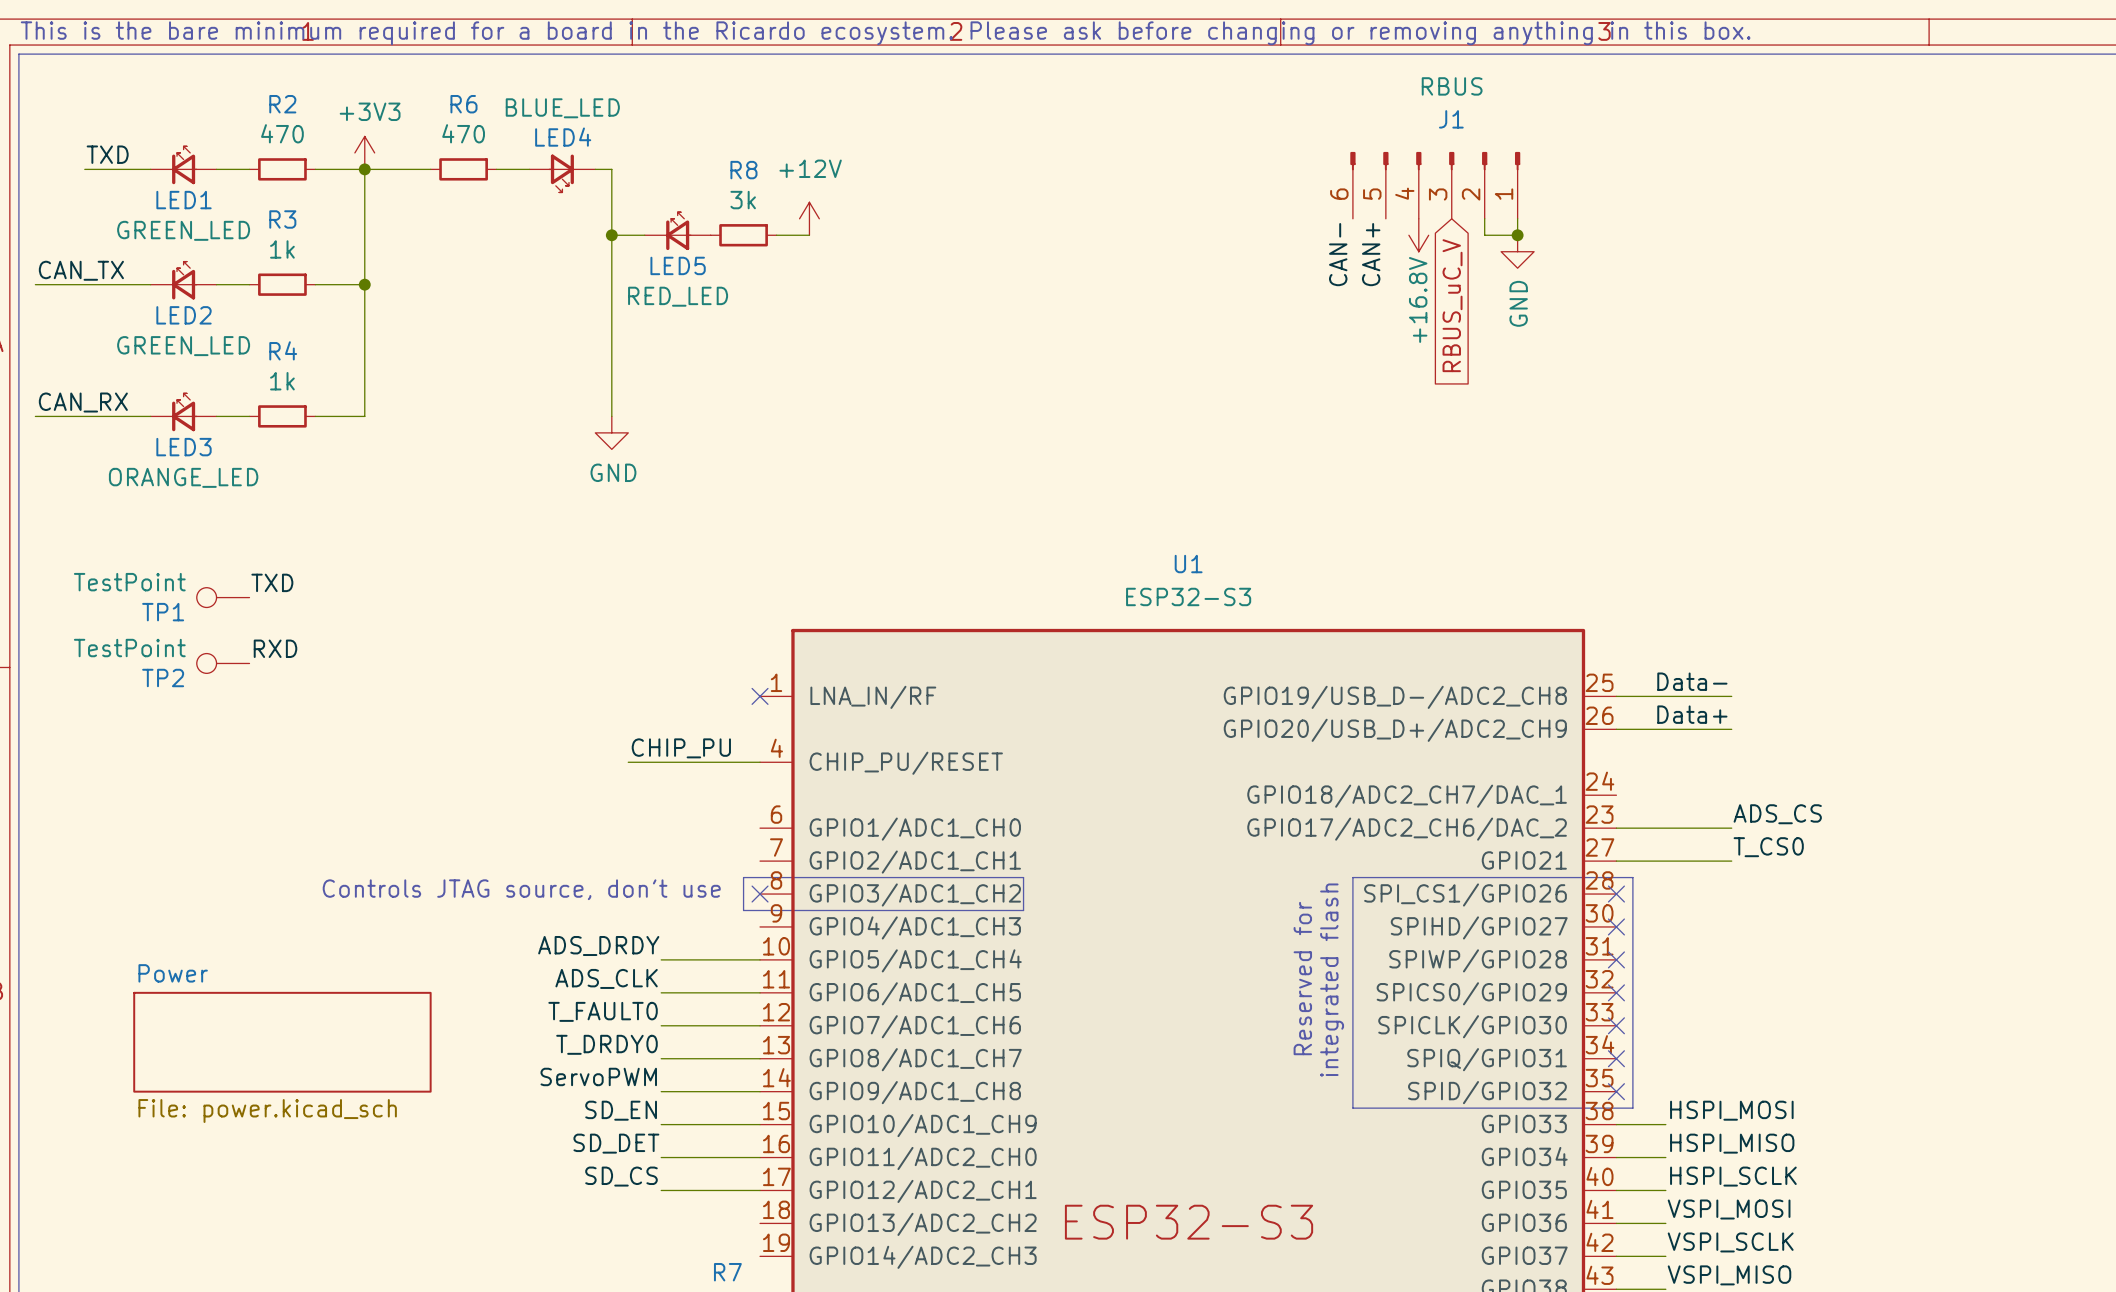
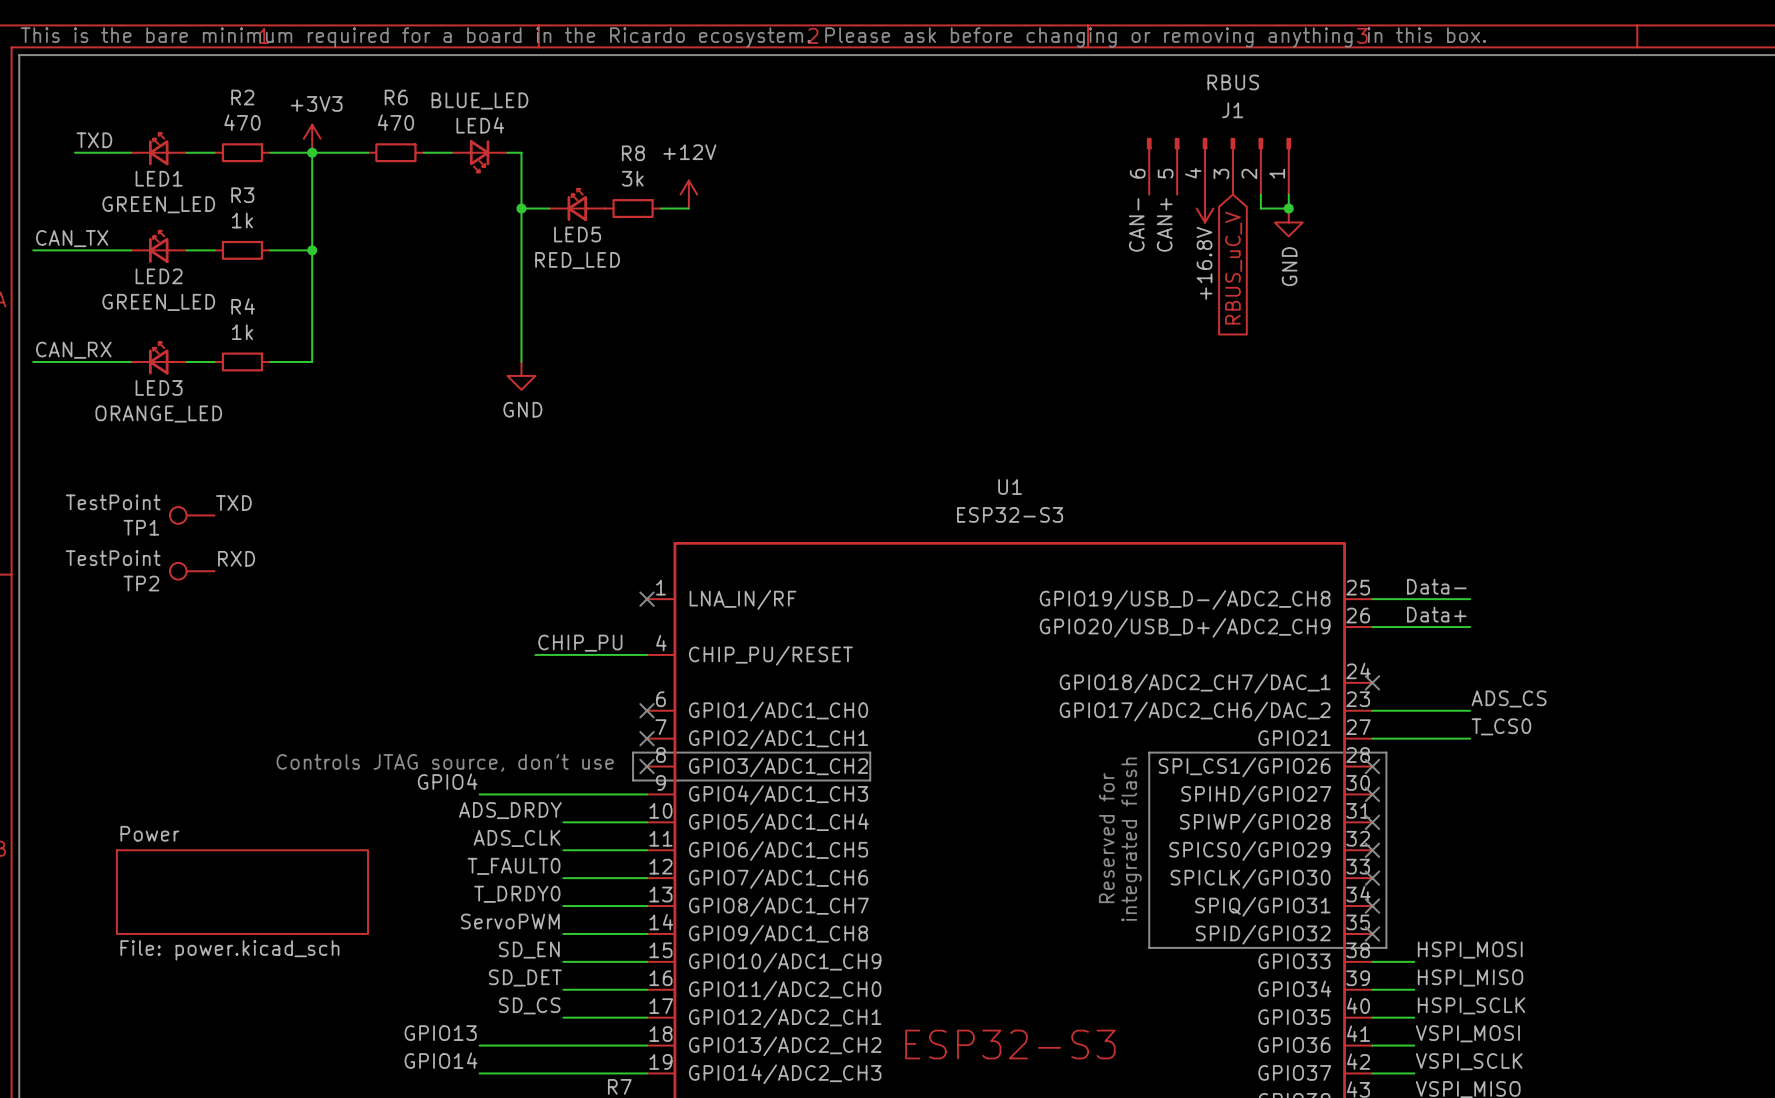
no-connect mark: none -> (1372, 682)
no-connect mark: none -> (647, 710)
no-connect mark: none -> (647, 738)
label: none -> GPIO4 (447, 781)
wire: none -> (479, 794) (647, 794)
label: none -> GPIO13 (440, 1033)
wire: none -> (479, 1045) (647, 1045)
label: none -> GPIO14 (440, 1060)
wire: none -> (479, 1073) (647, 1073)

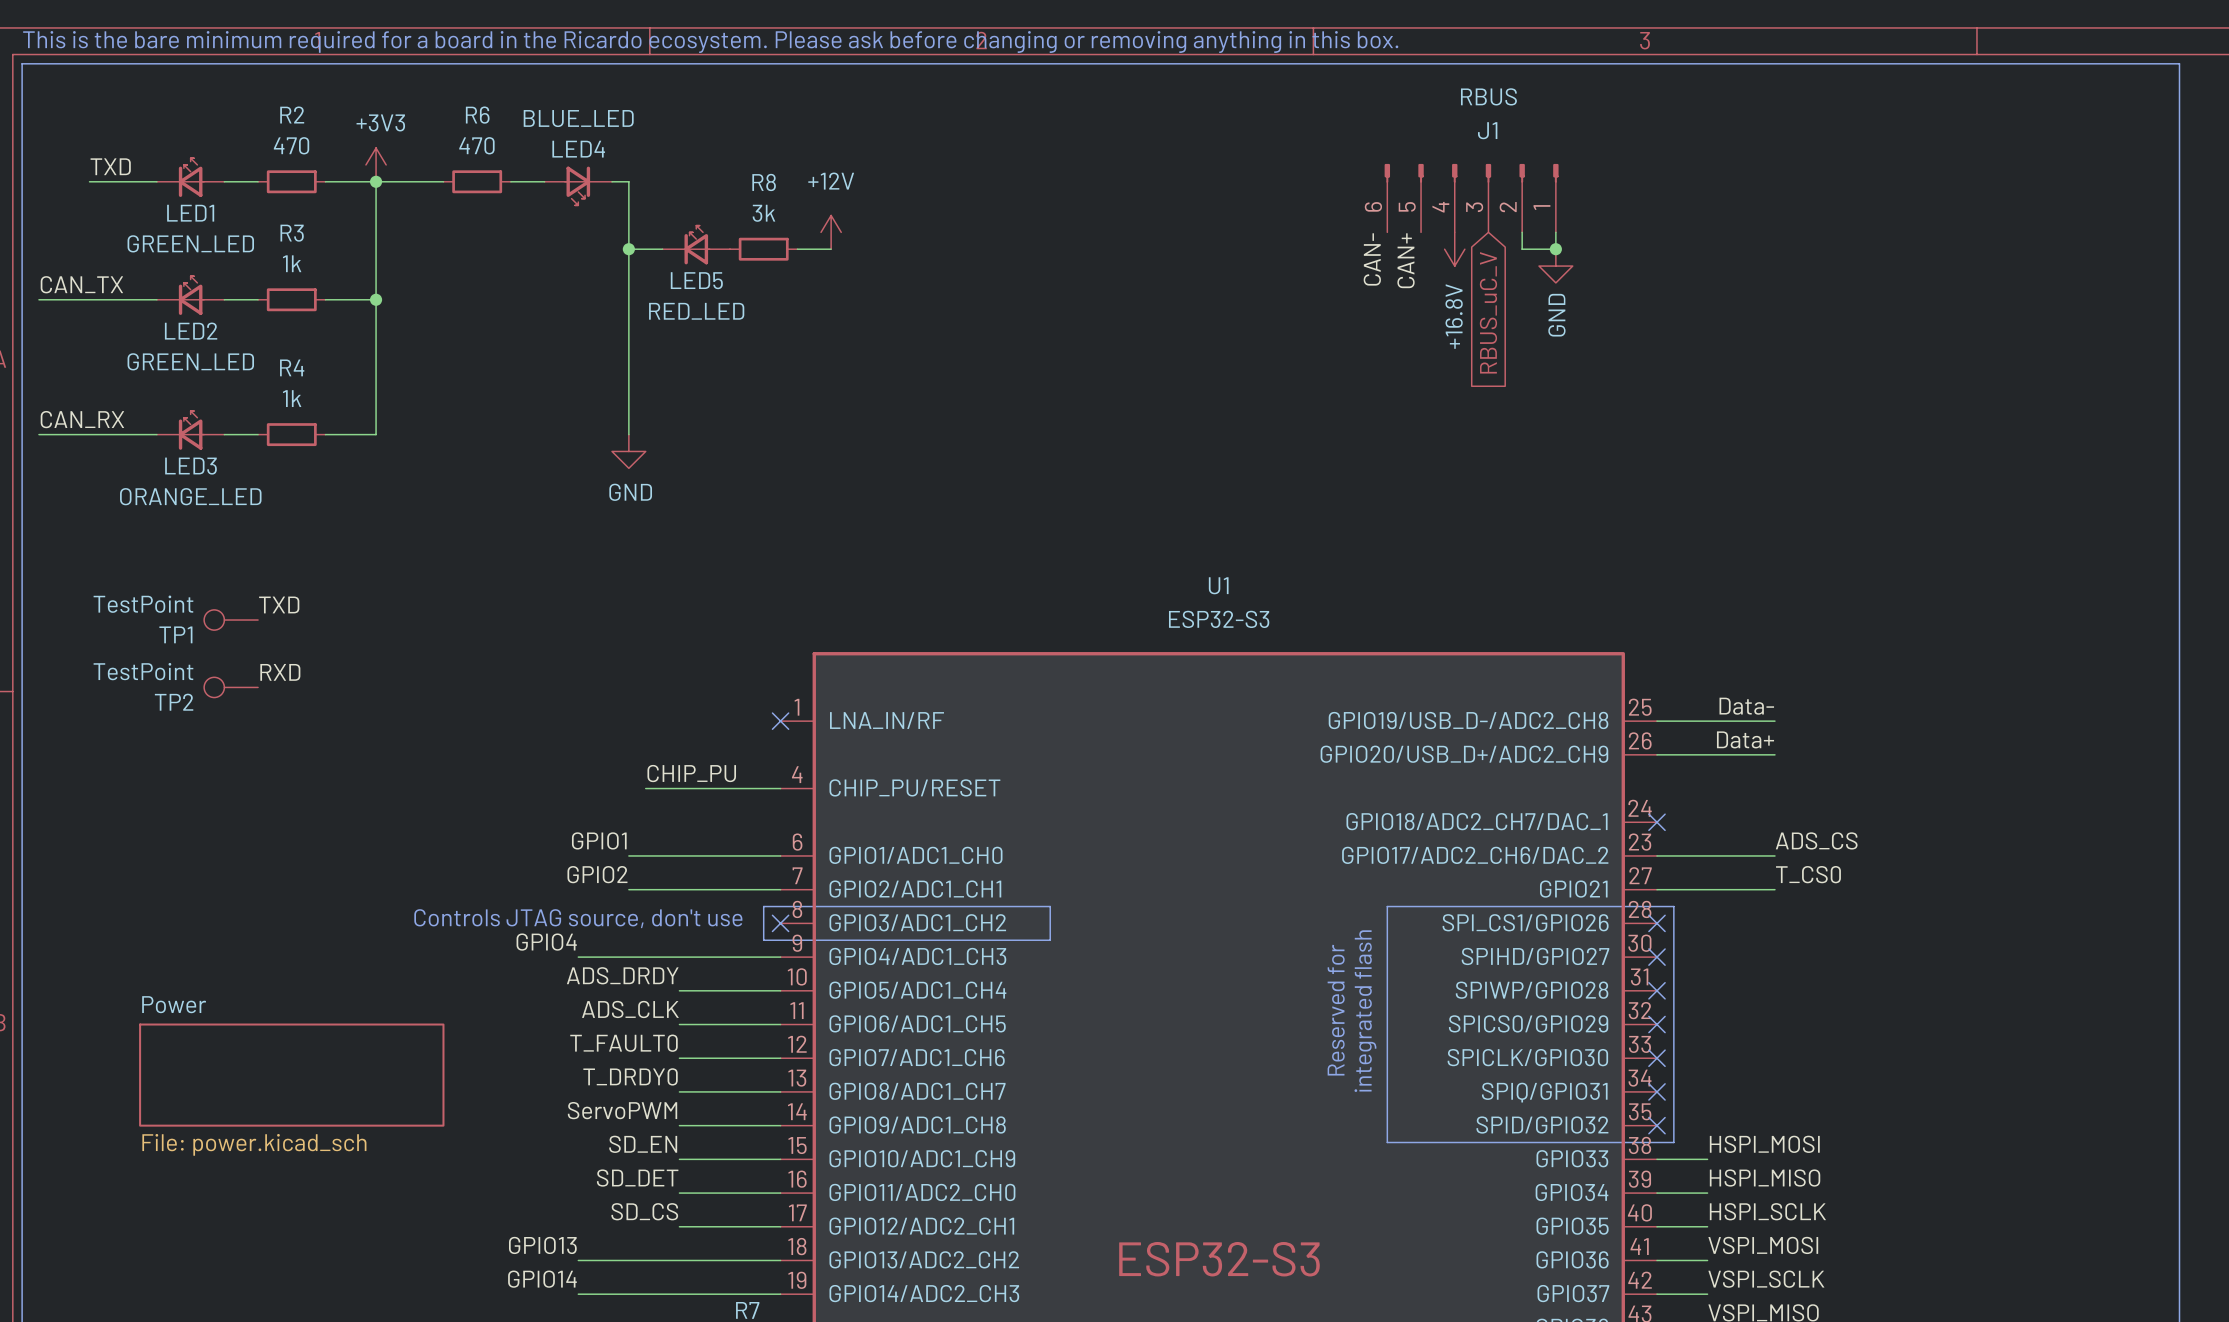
label: none -> GPIO1 (599, 840)
wire: none -> (628, 855) (780, 855)
no-connect mark: (647, 710) -> none
label: none -> GPIO2 (597, 874)
wire: none -> (628, 889) (780, 889)
no-connect mark: (647, 738) -> none

